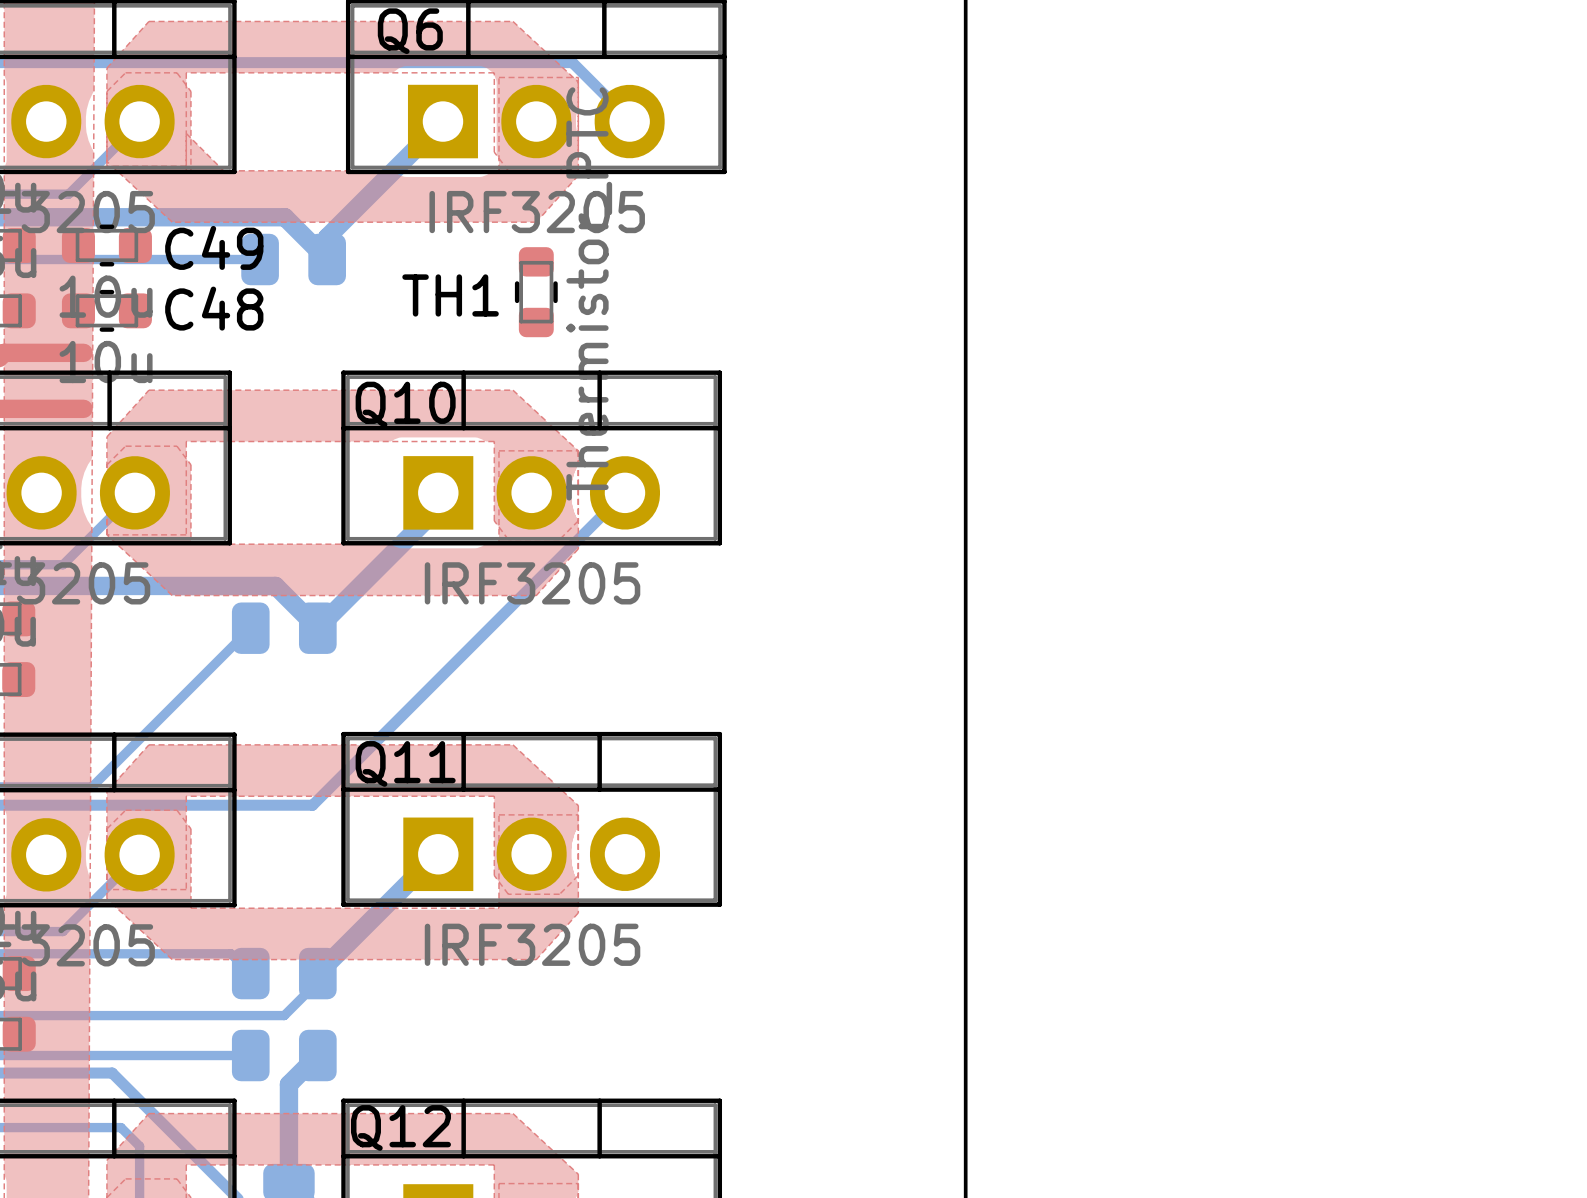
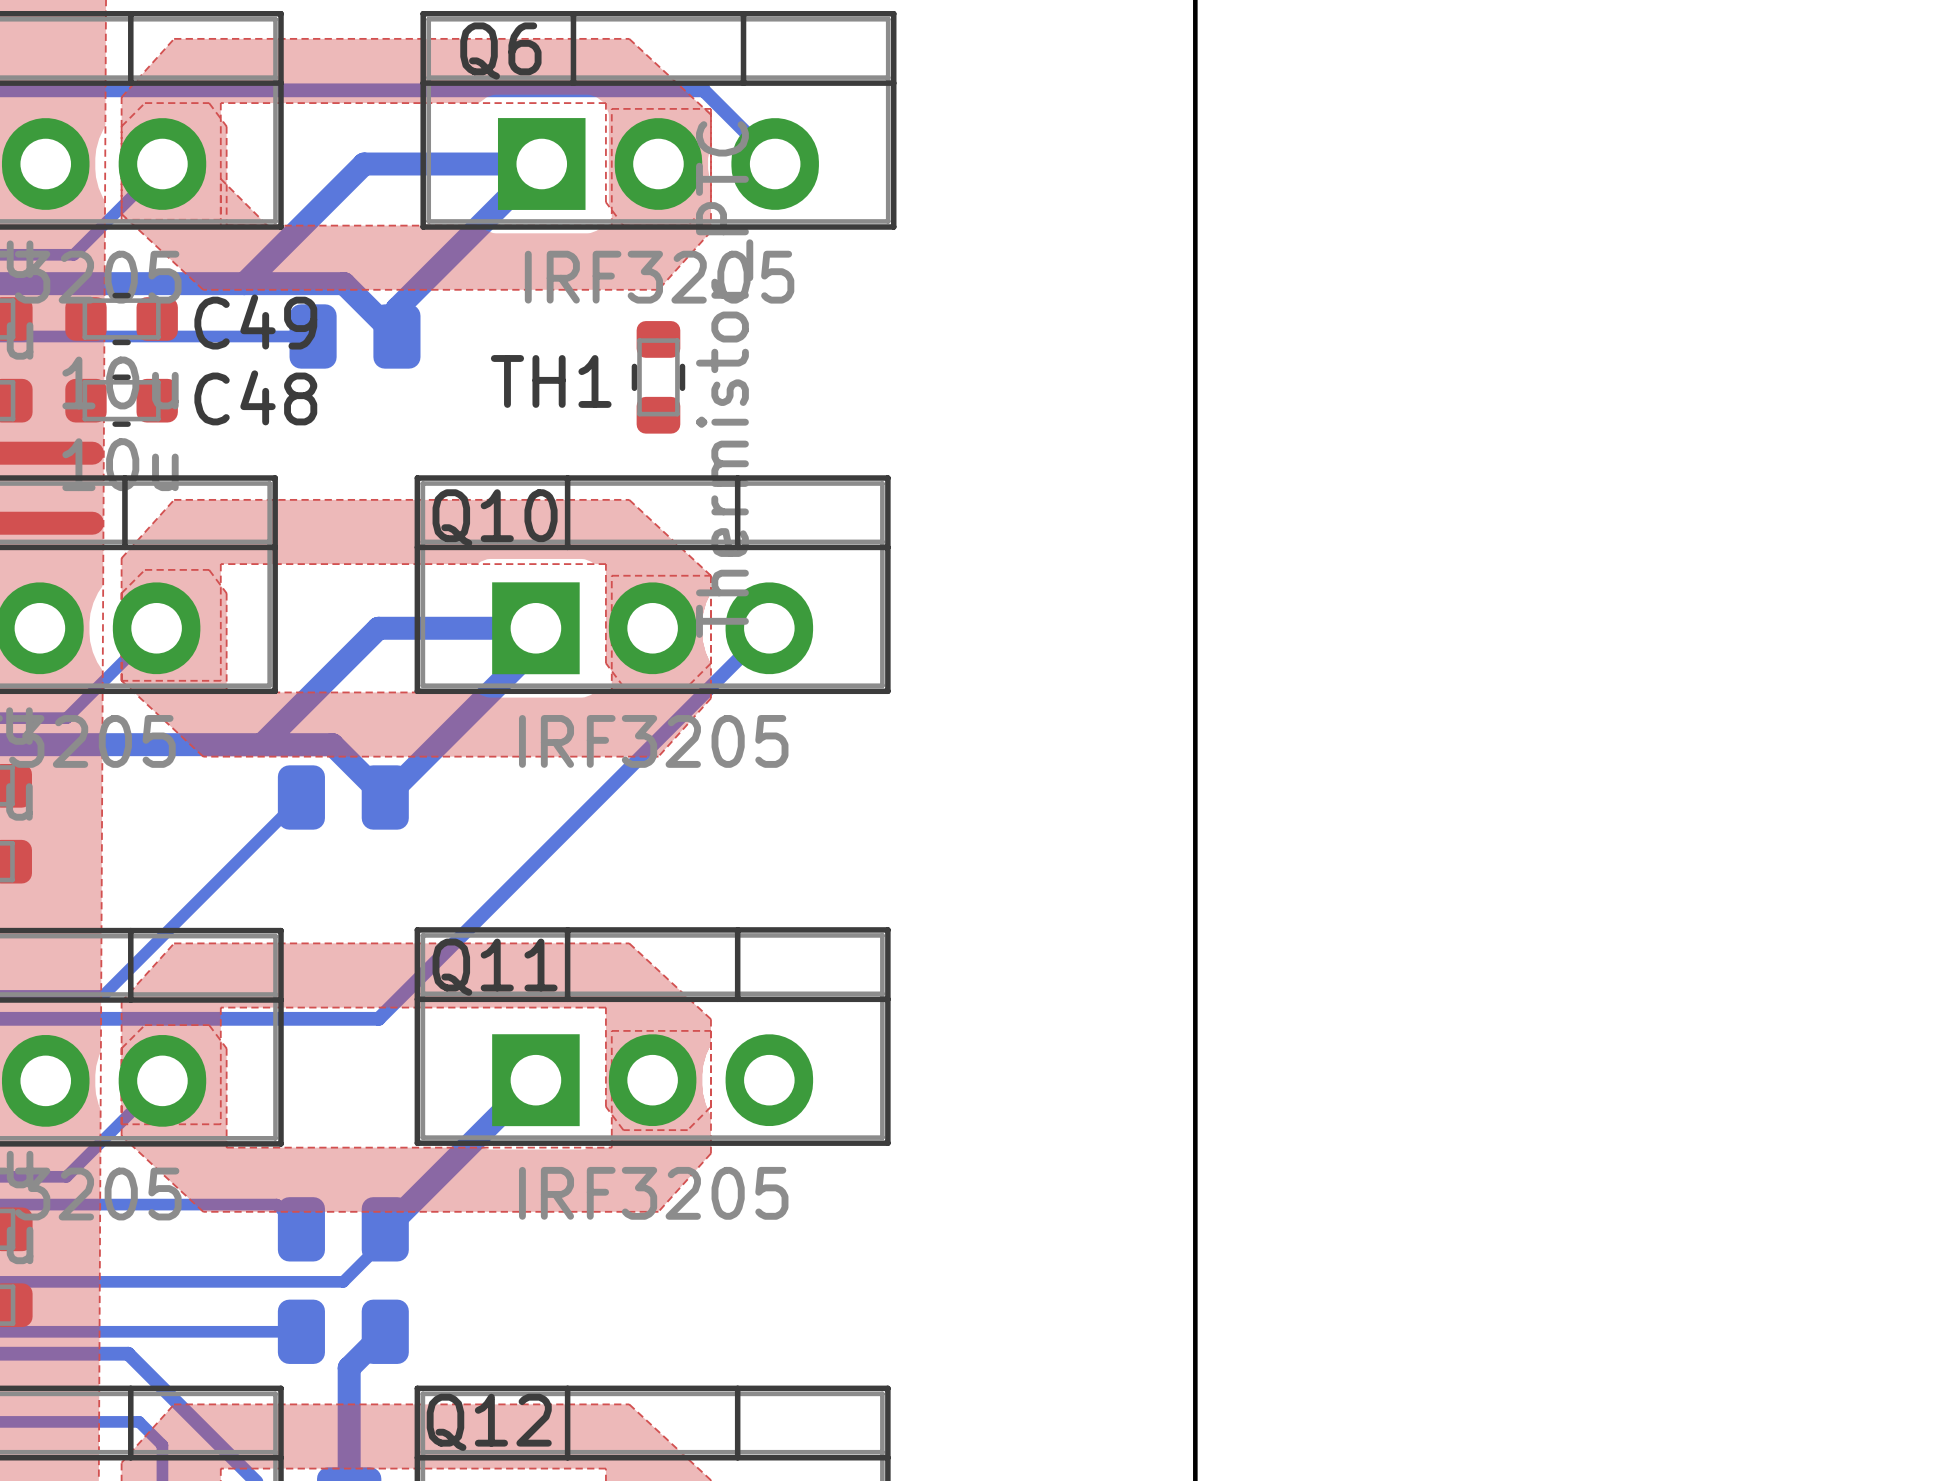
bottom track: none -> (541, 164) (364, 164) (244, 283)
bottom track: none -> (535, 628) (378, 628) (261, 744)

